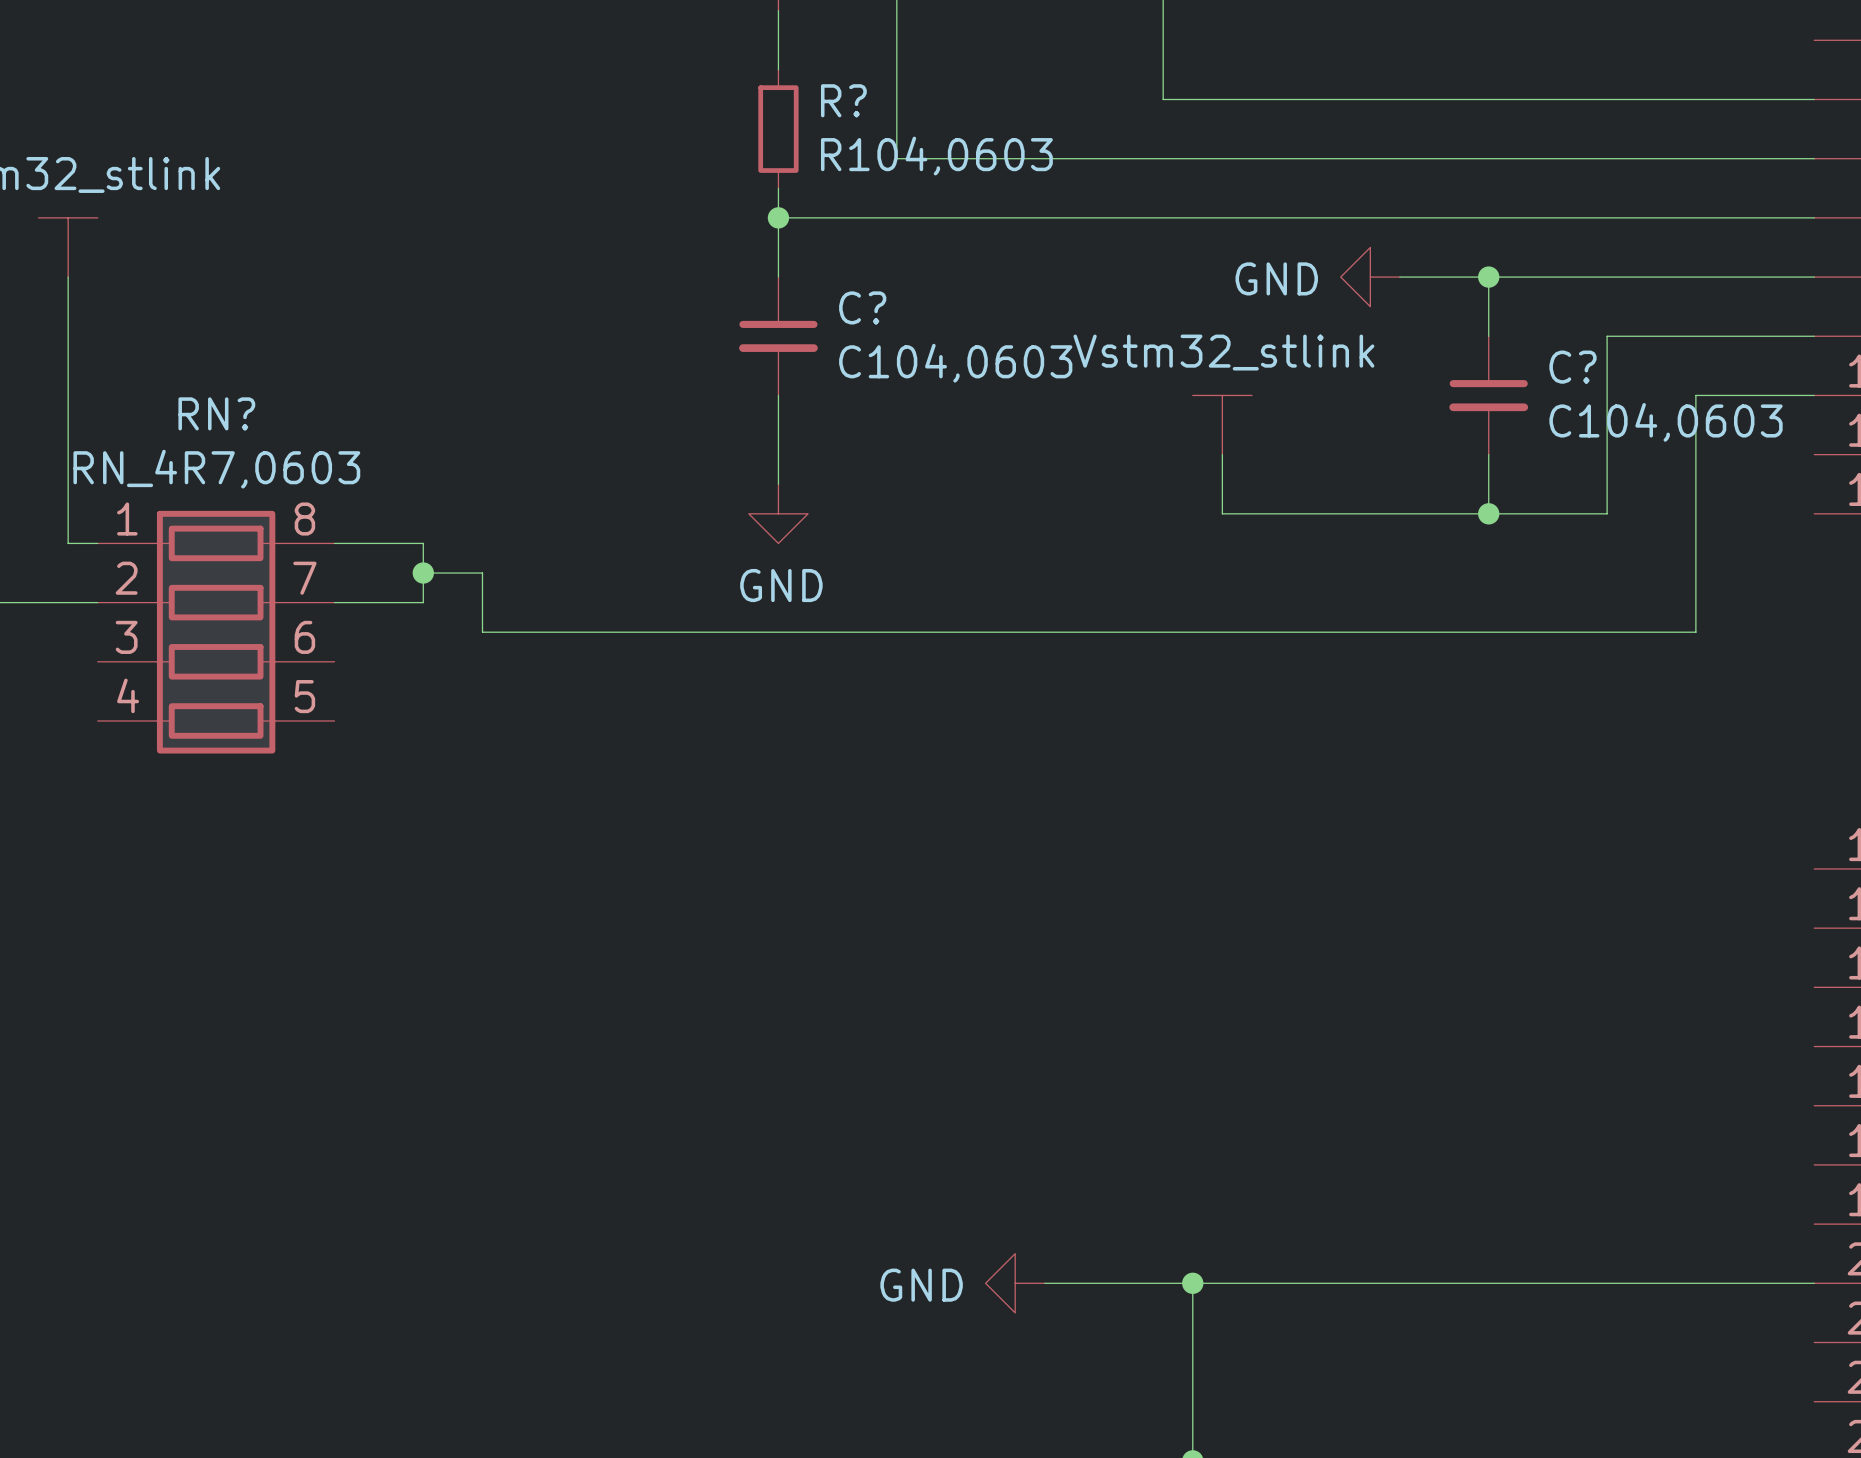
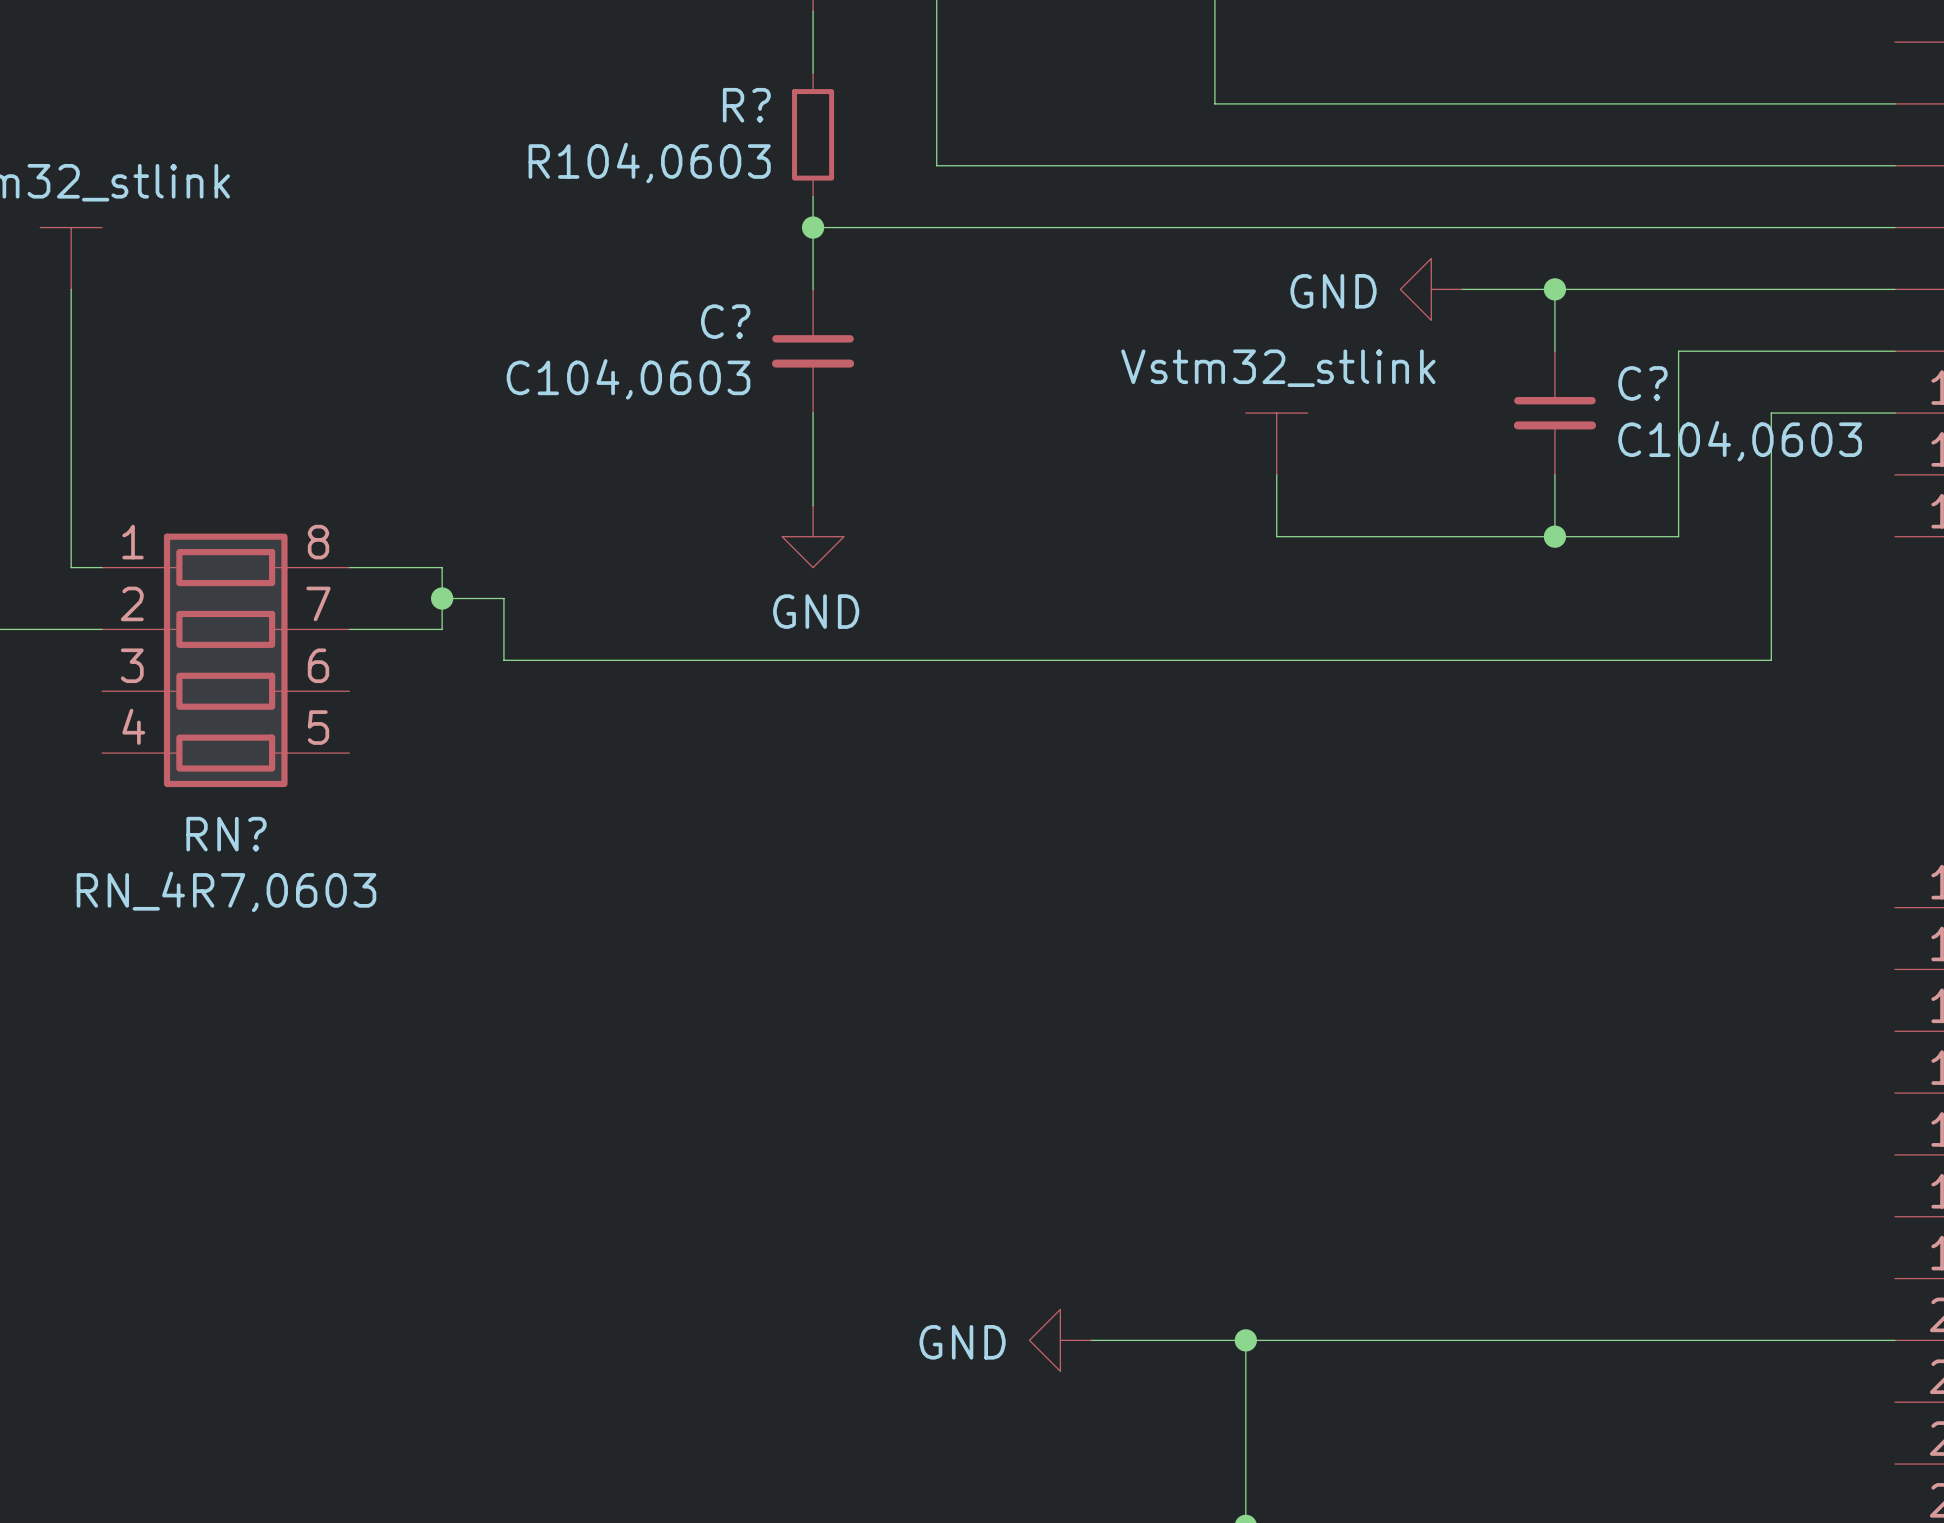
R? name position: R? (843, 100) -> R? (746, 105)
R? value position: R104,0603 (936, 156) -> R104,0603 (649, 162)
C? name position: C? (862, 307) -> C? (725, 321)
C? value position: C104,0603 (955, 363) -> C104,0603 (628, 379)
RN? name position: RN? (216, 413) -> RN? (226, 834)
RN? value position: RN_4R7,0603 (216, 469) -> RN_4R7,0603 (226, 891)

